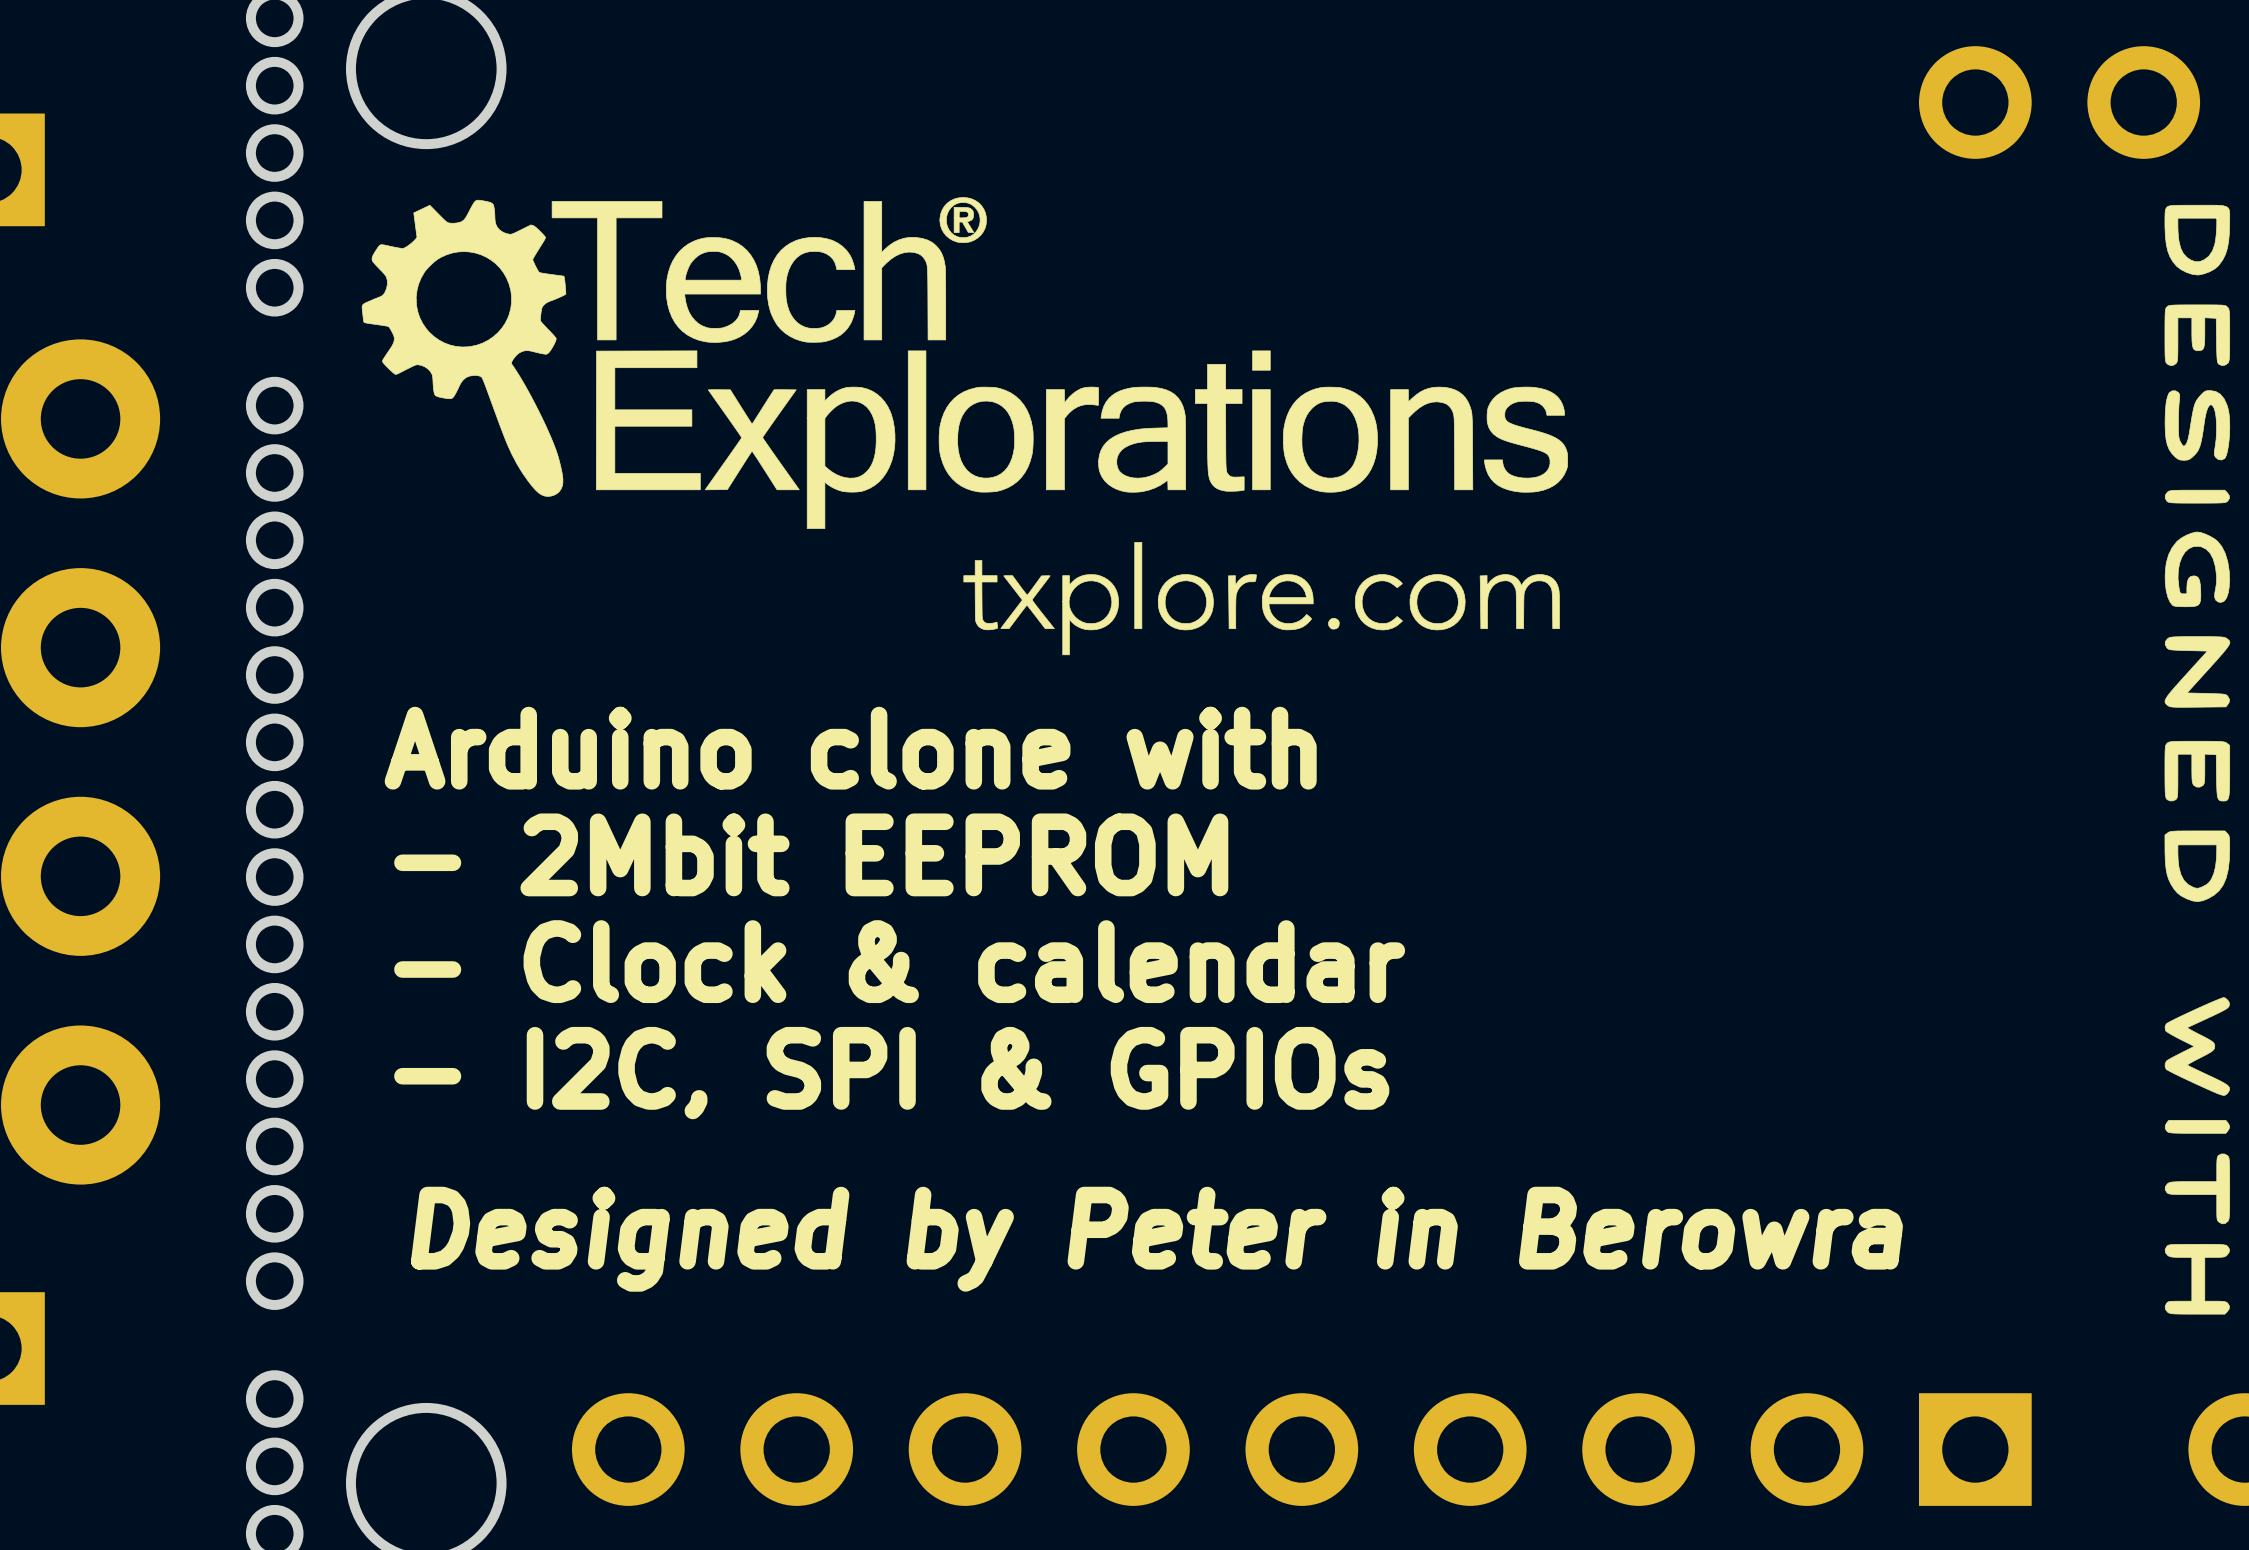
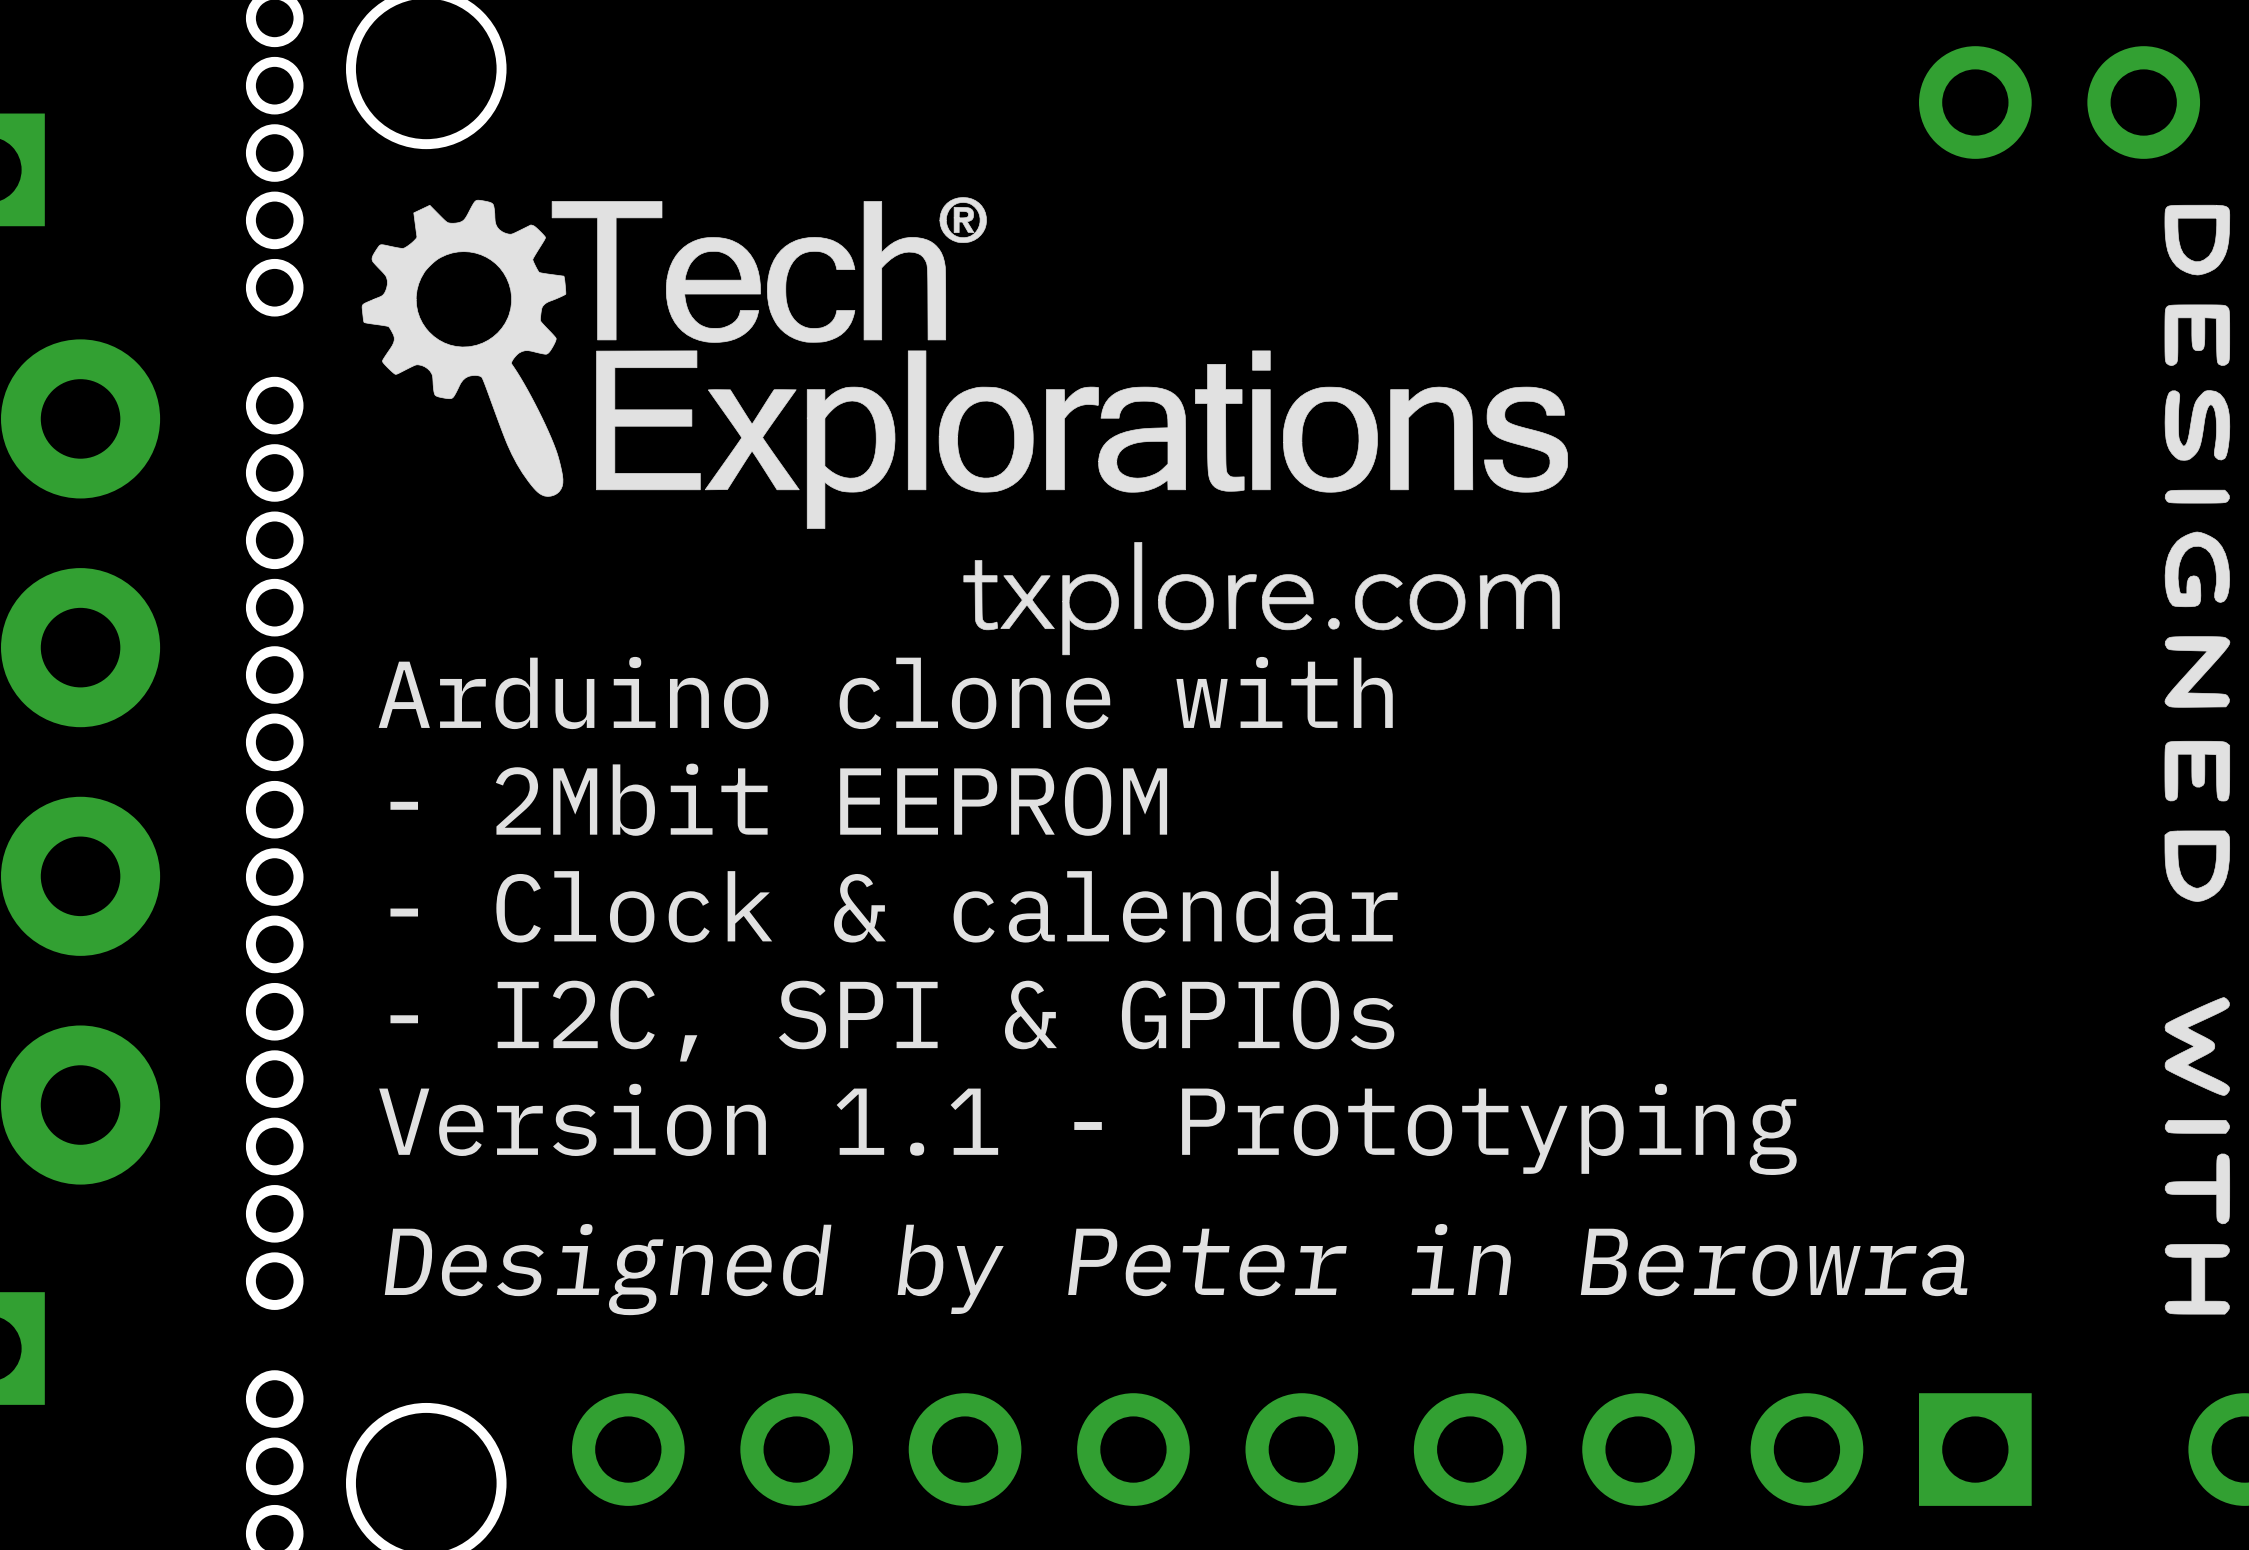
text position: Arduino clone with (850, 748) -> Arduino clone with (885, 693)
text position: - 2Mbit EEPROM (811, 854) -> - 2Mbit EEPROM (778, 799)
text position: - Clock & calendar (899, 961) -> - Clock & calendar (894, 906)
text position: - I2C, SPI & GPIOs (891, 1073) -> - I2C, SPI & GPIOs (892, 1021)
text: none -> Version 1.1 - Prototyping (1087, 1129)
text position: Designed by Peter in Berowra (1156, 1239) -> Designed by Peter in Berowra (1176, 1269)

